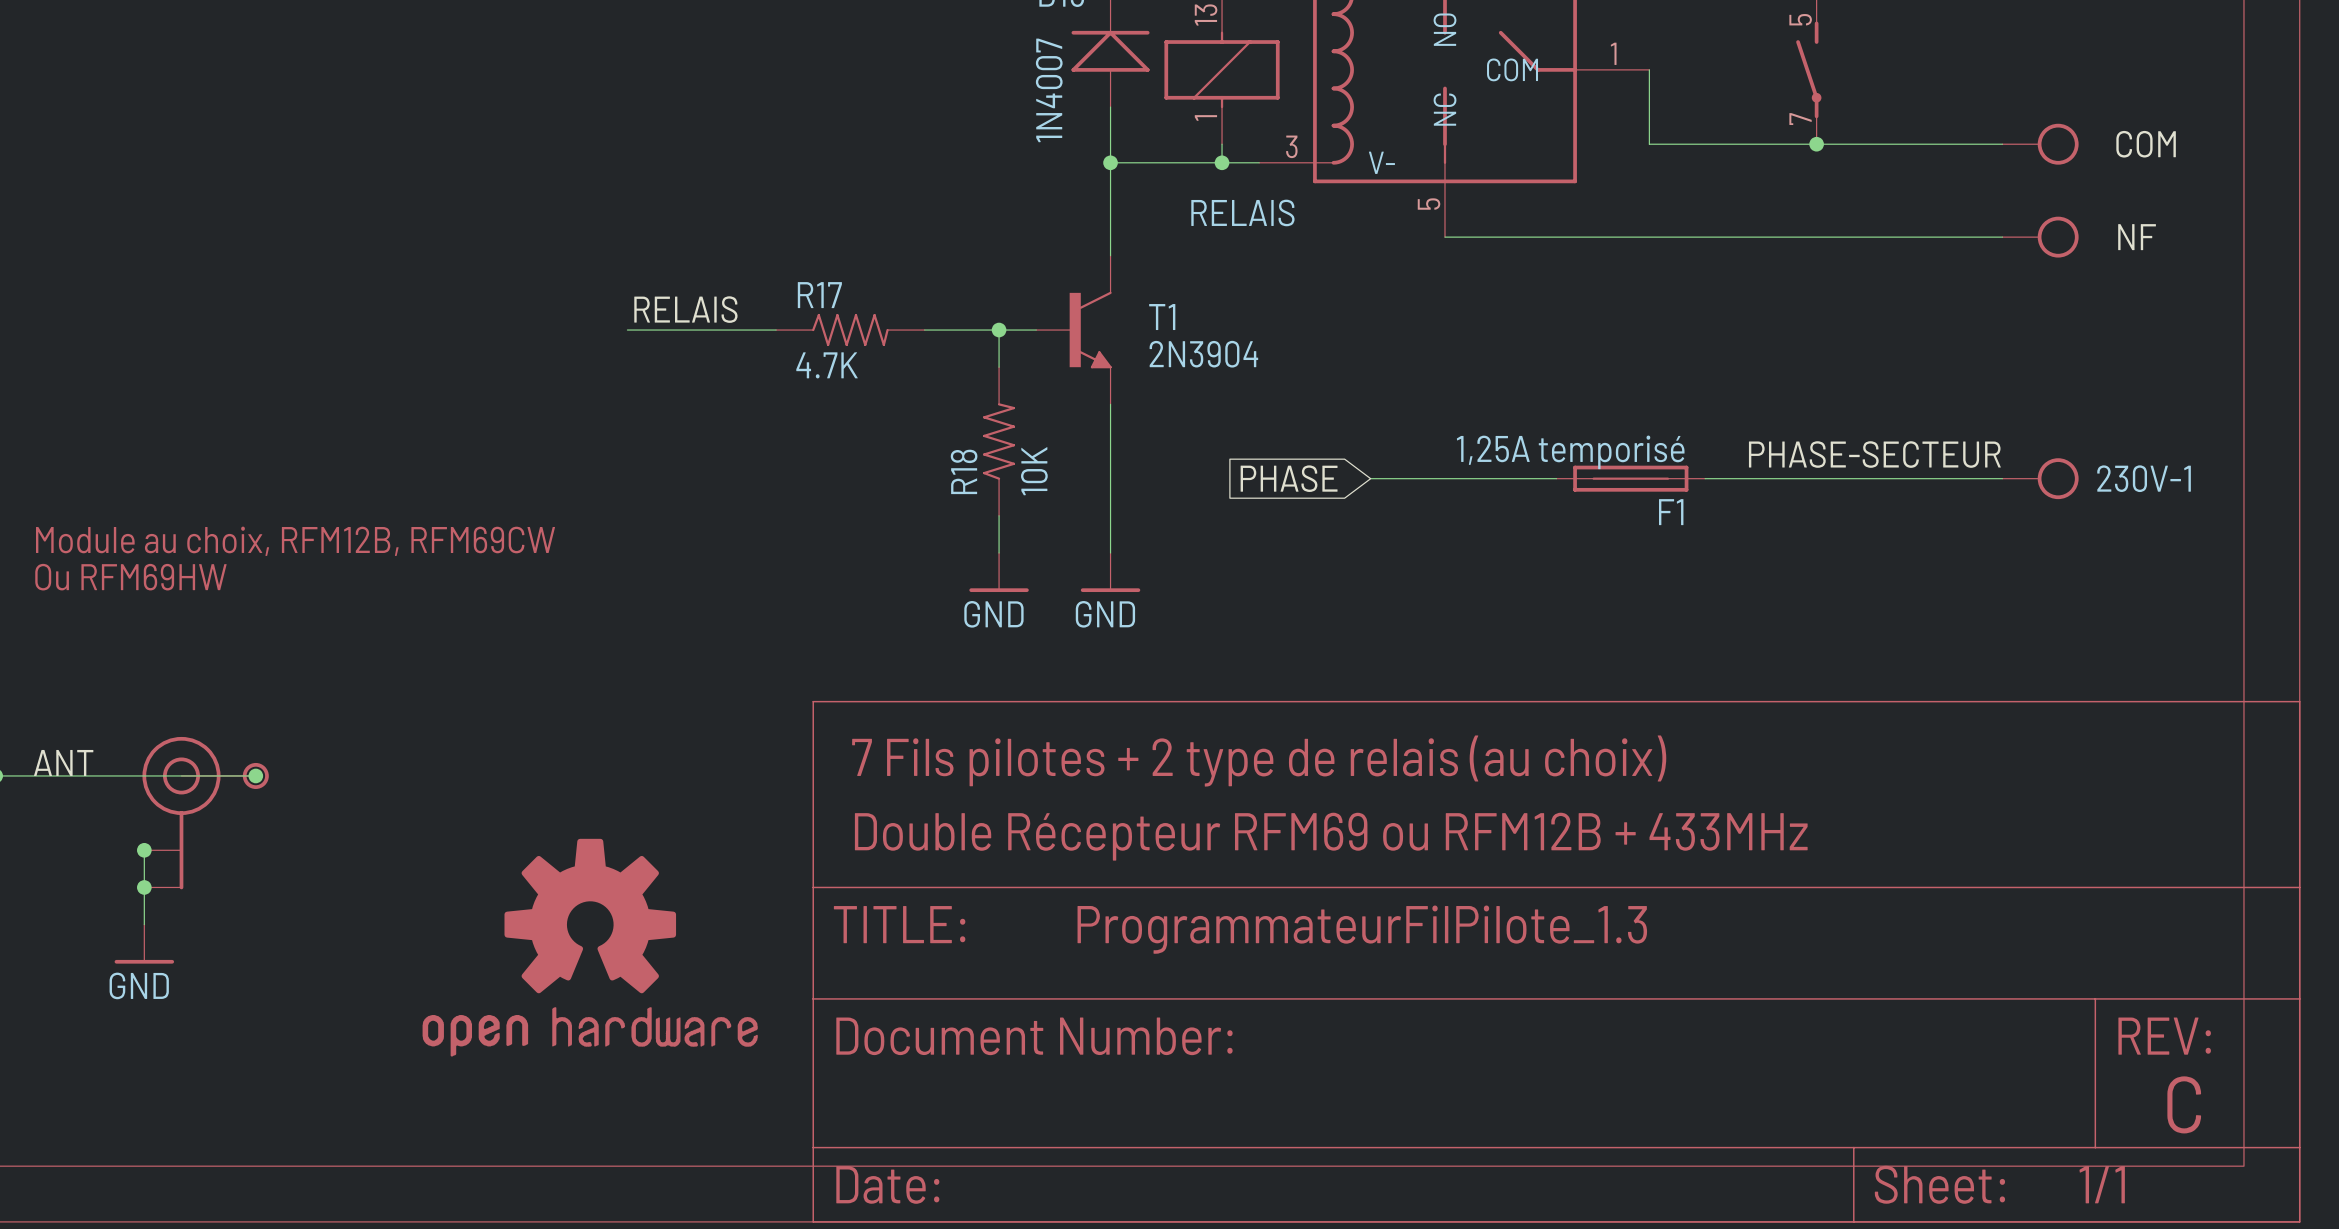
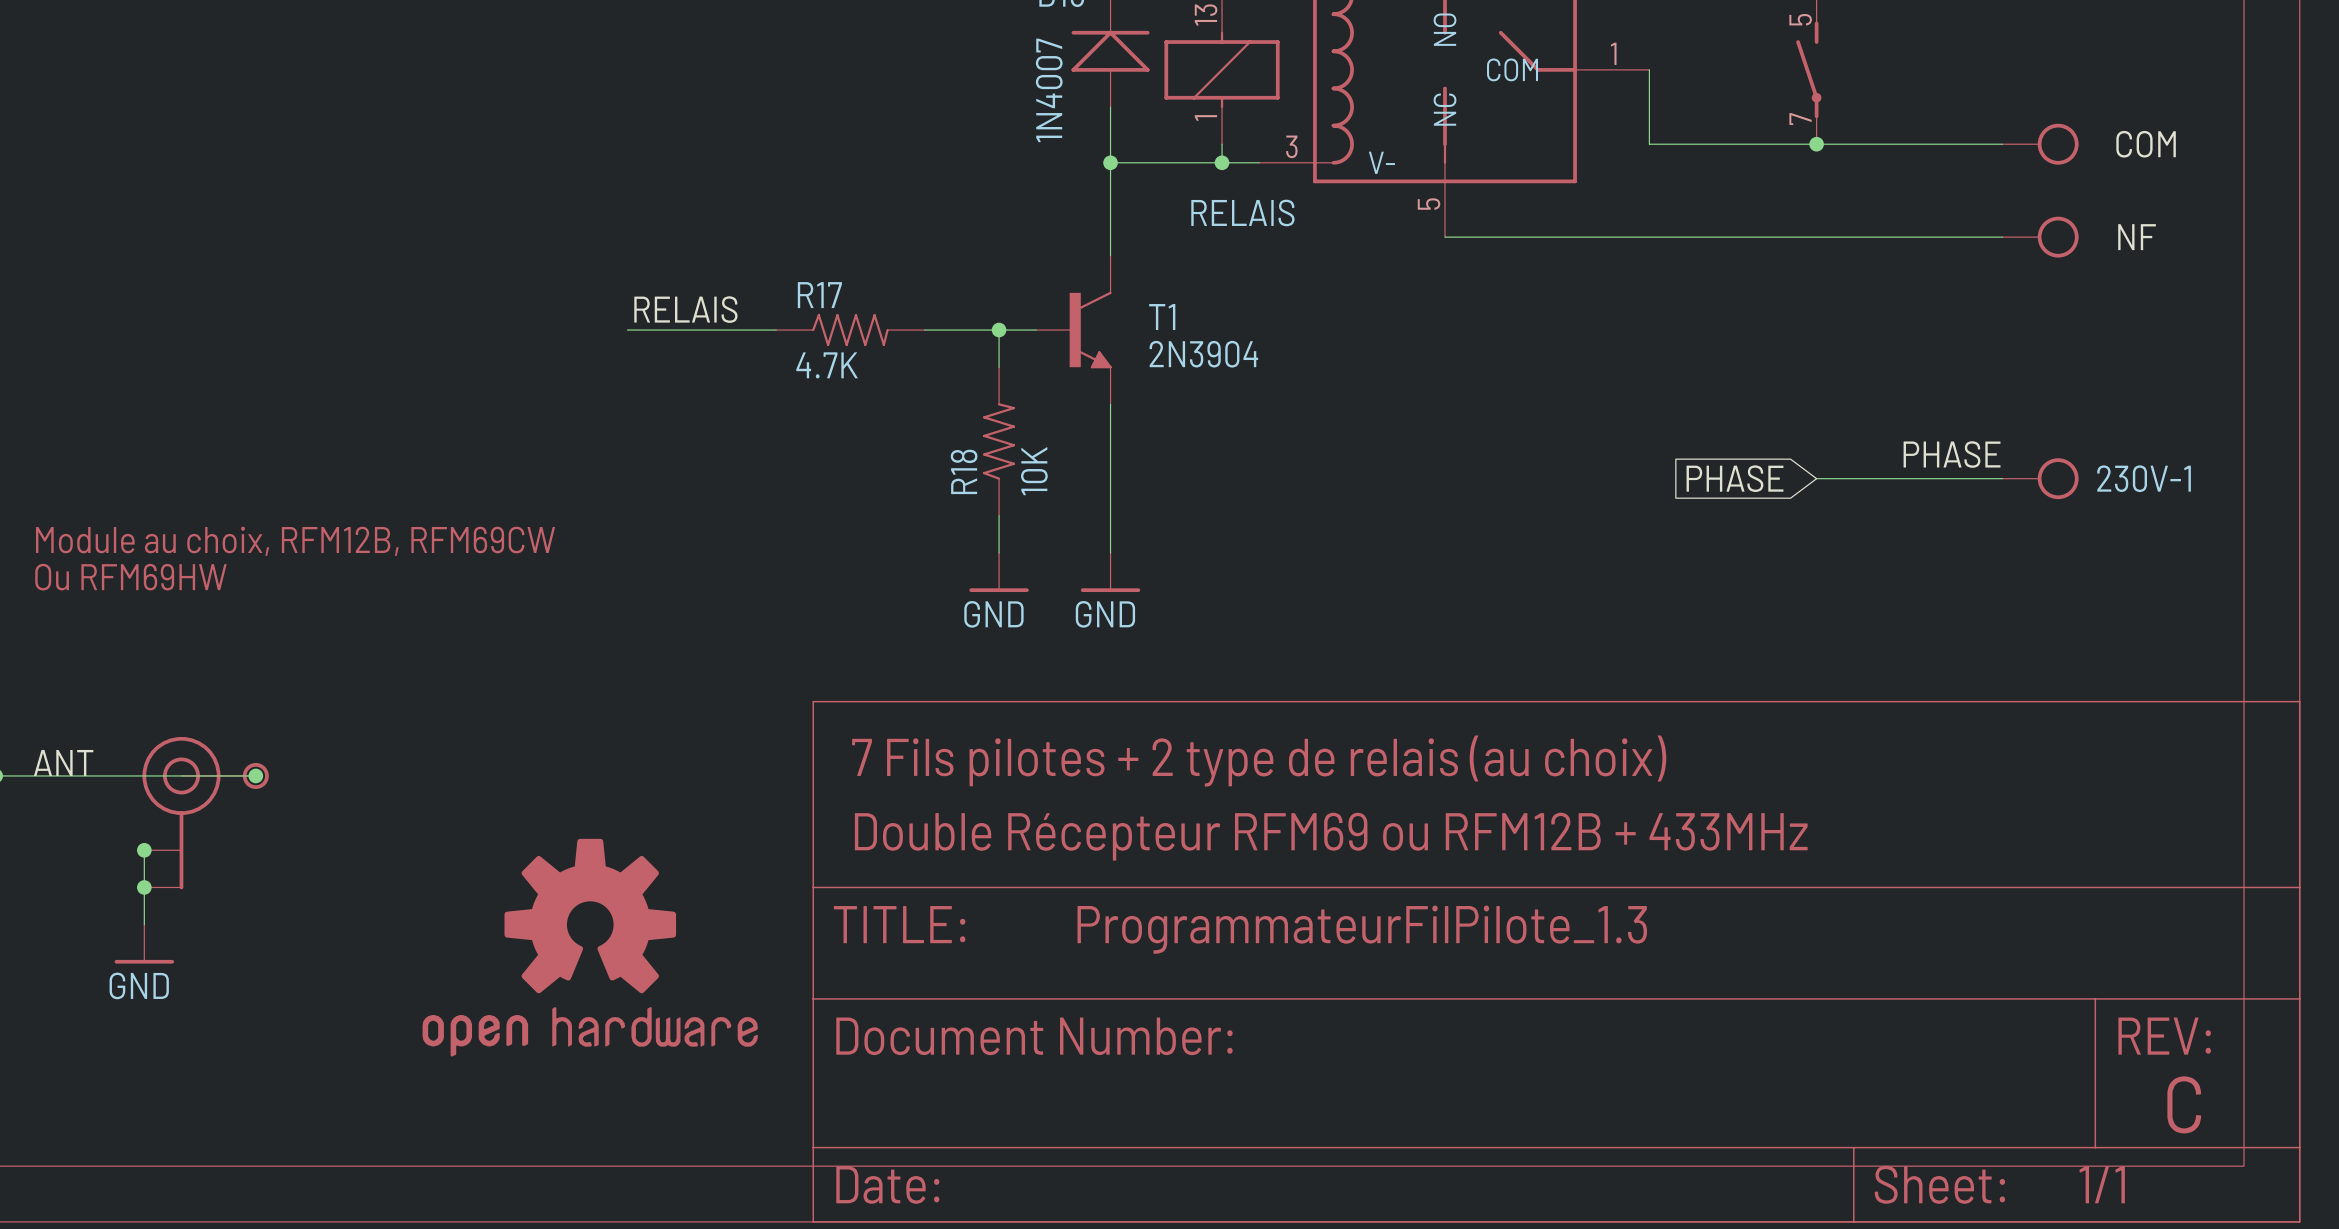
label: PHASE-SECTEUR (1874, 454) -> PHASE (1952, 454)
global label: PHASE (1289, 478) -> none
wire: (1370, 478) (1556, 478) -> none
F1: 1,25A temporisé (1630, 478) -> none
wire: (1705, 478) (1816, 478) -> none
global label: none -> PHASE (1735, 478)

